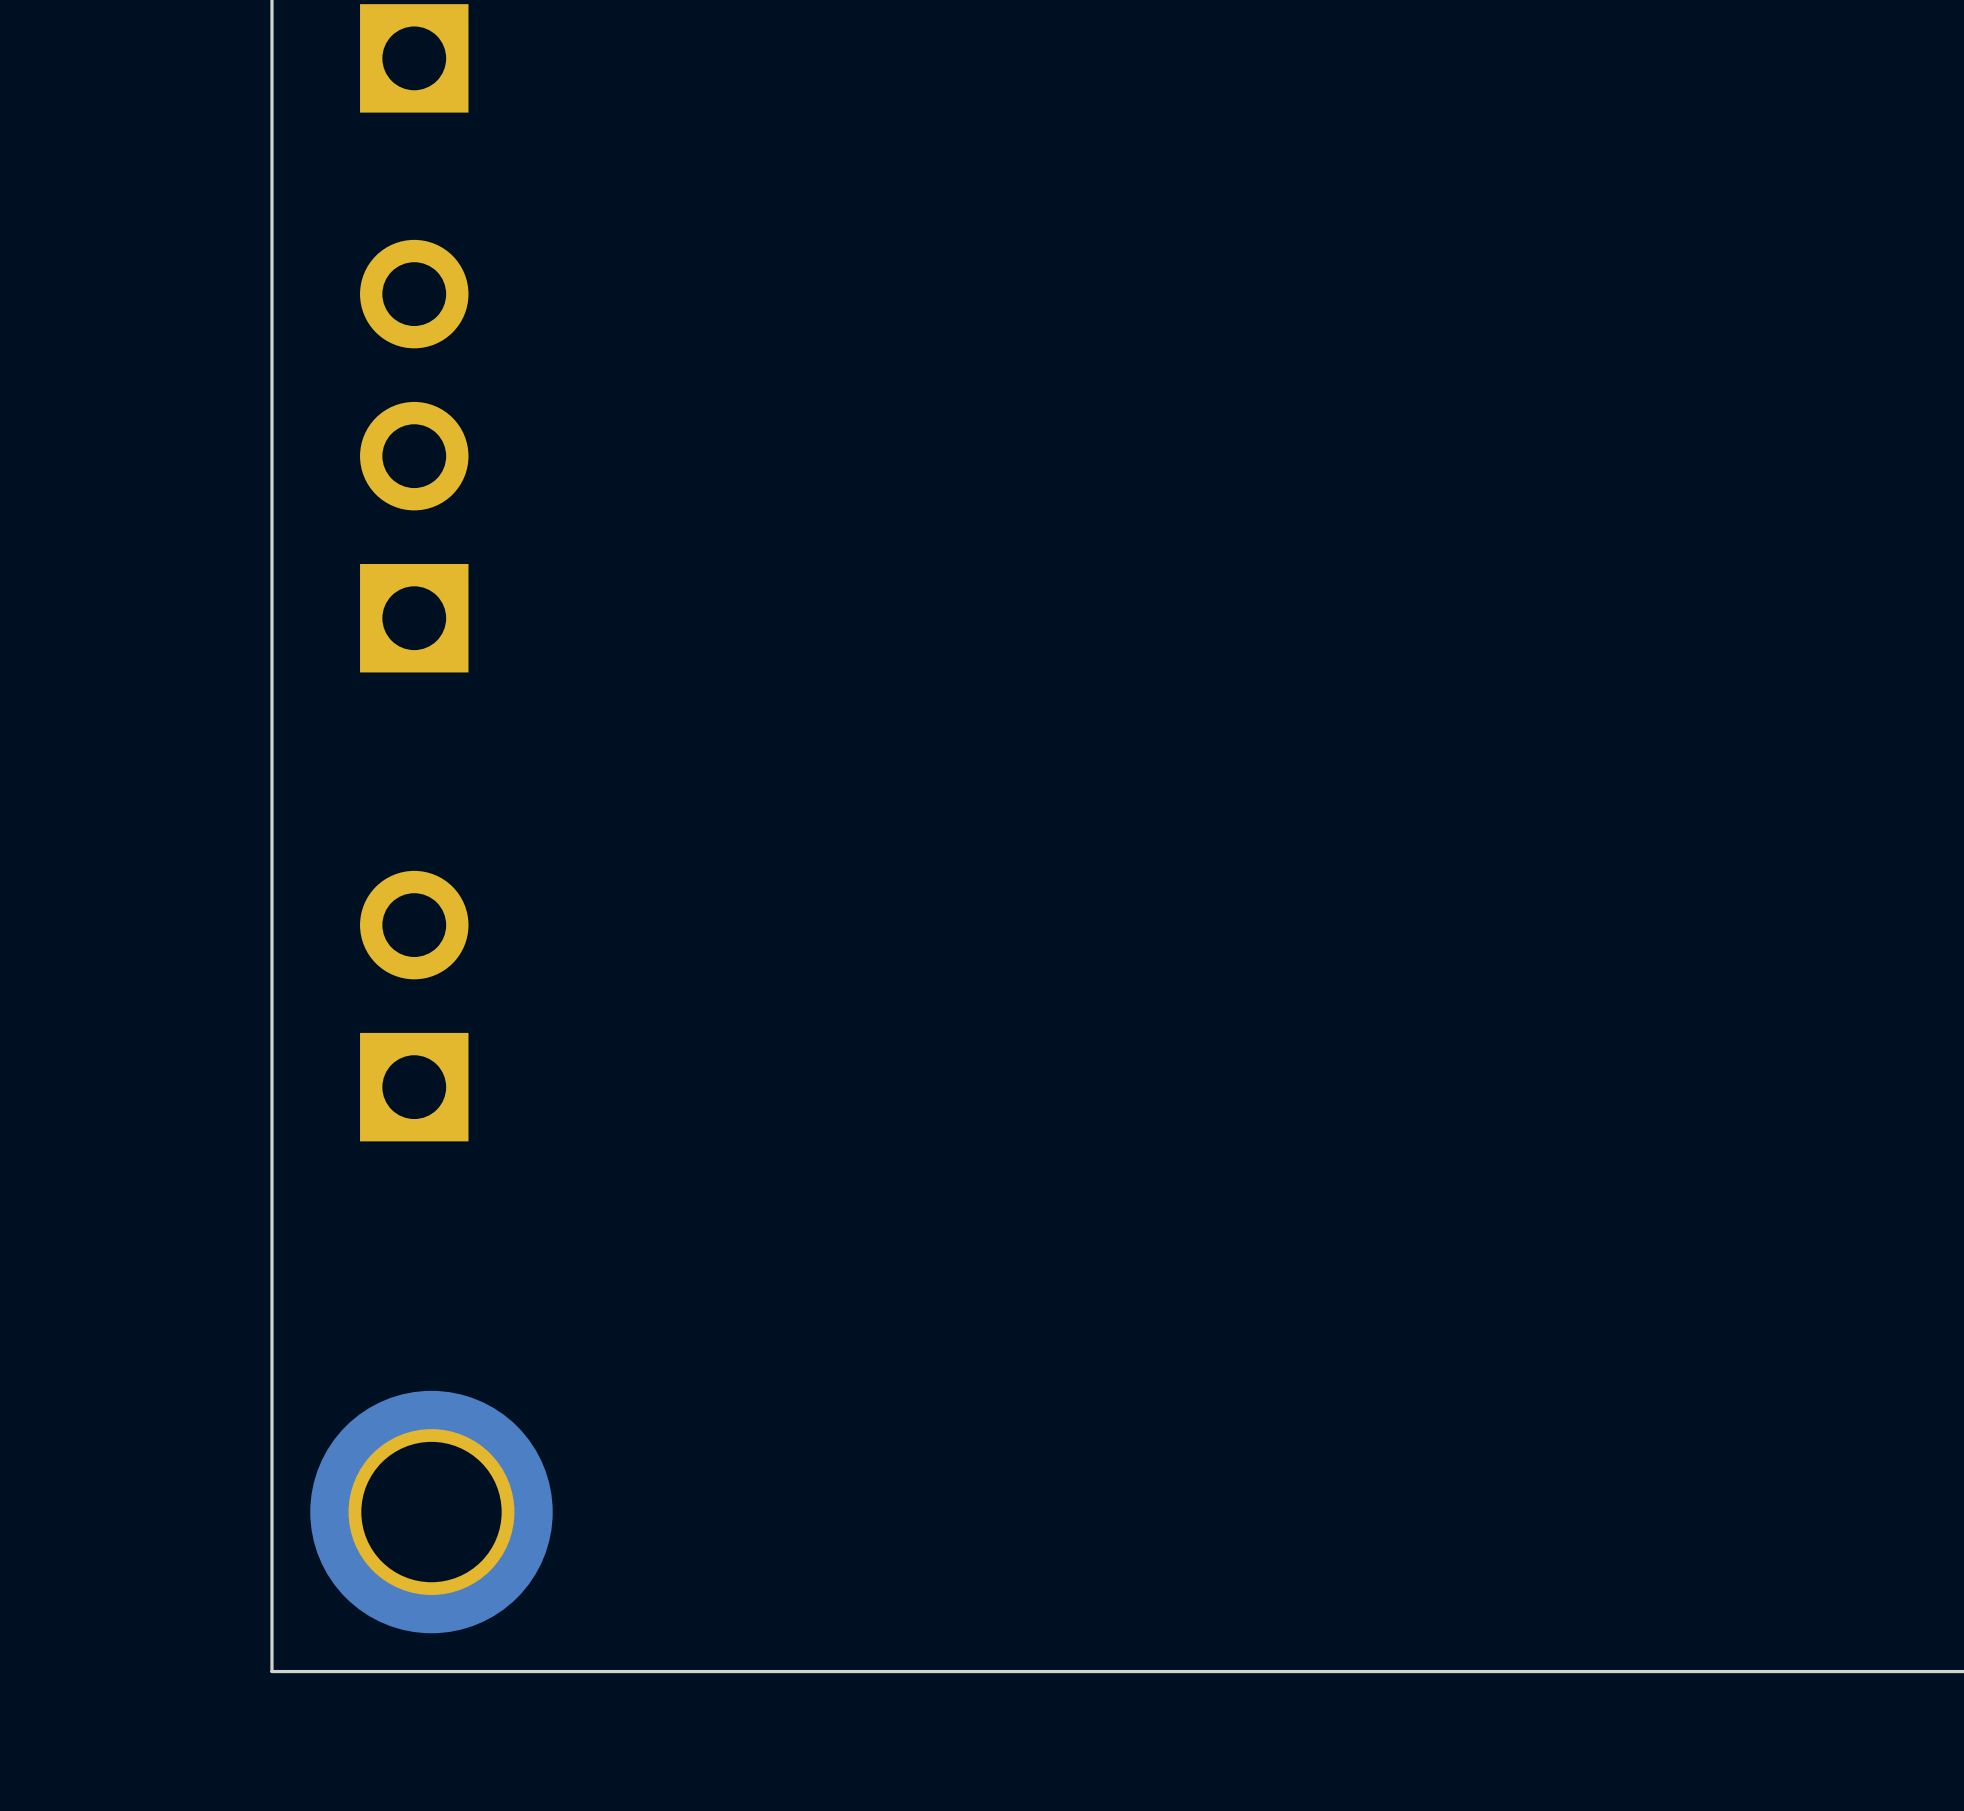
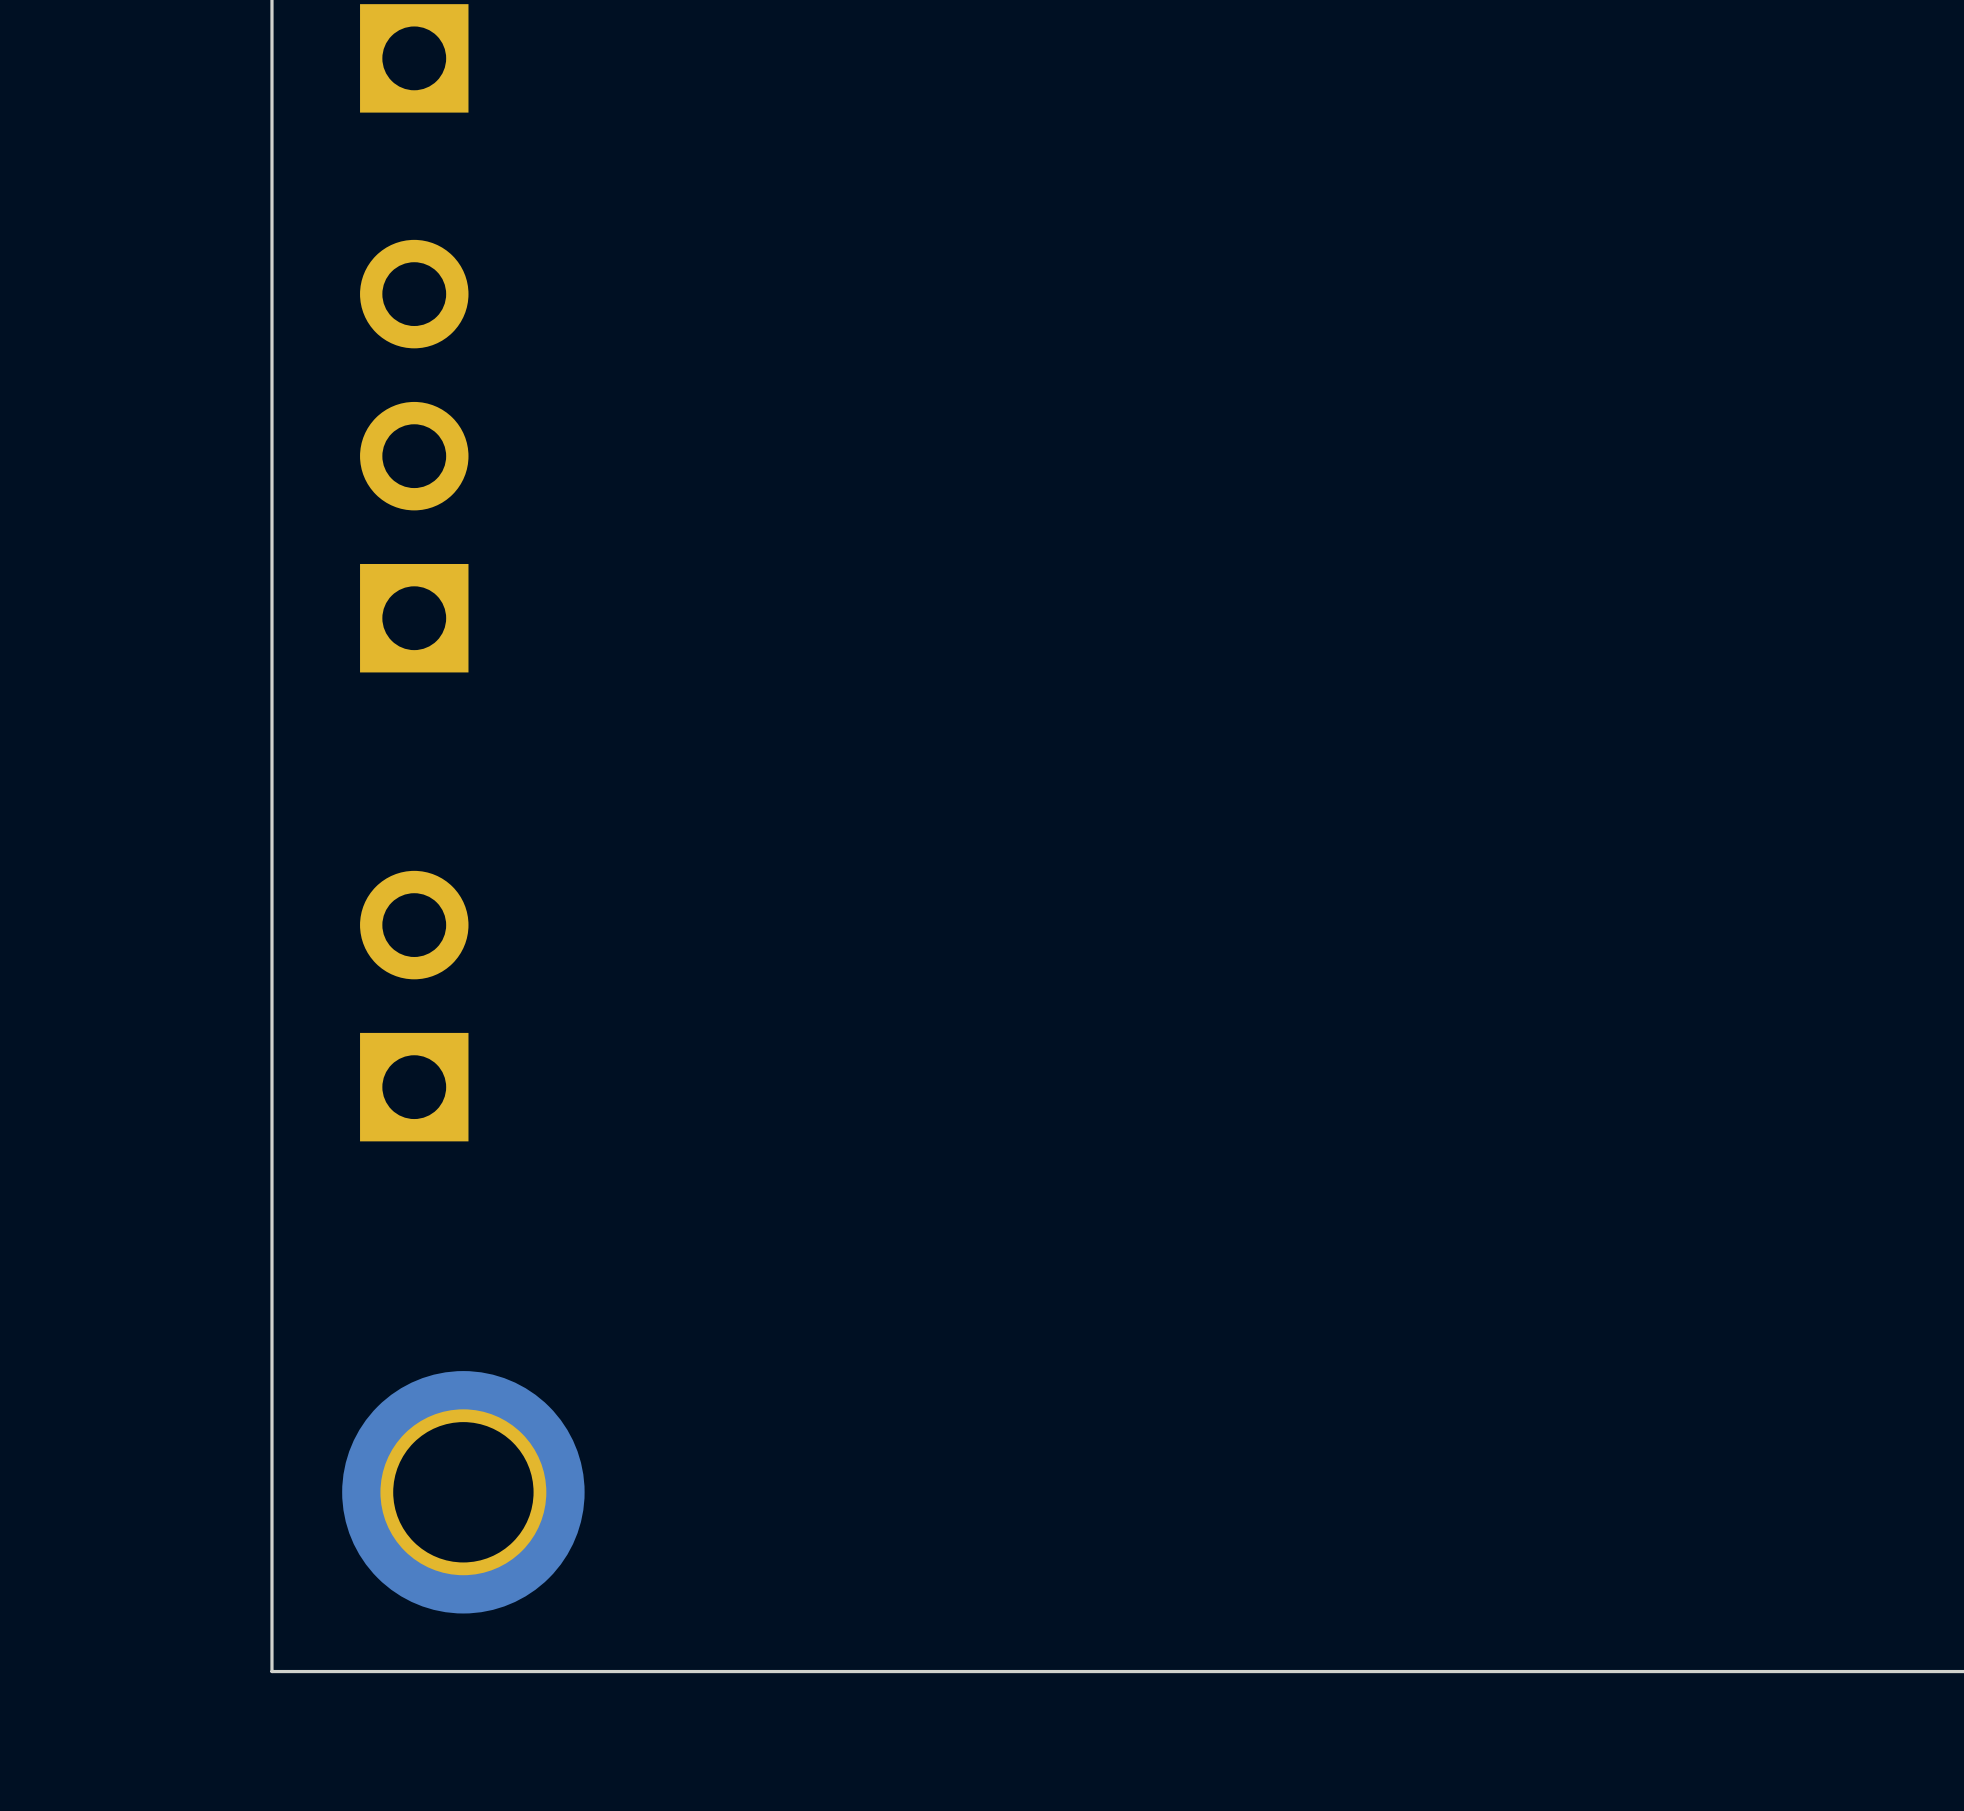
part position: (431, 1512) -> (463, 1492)

